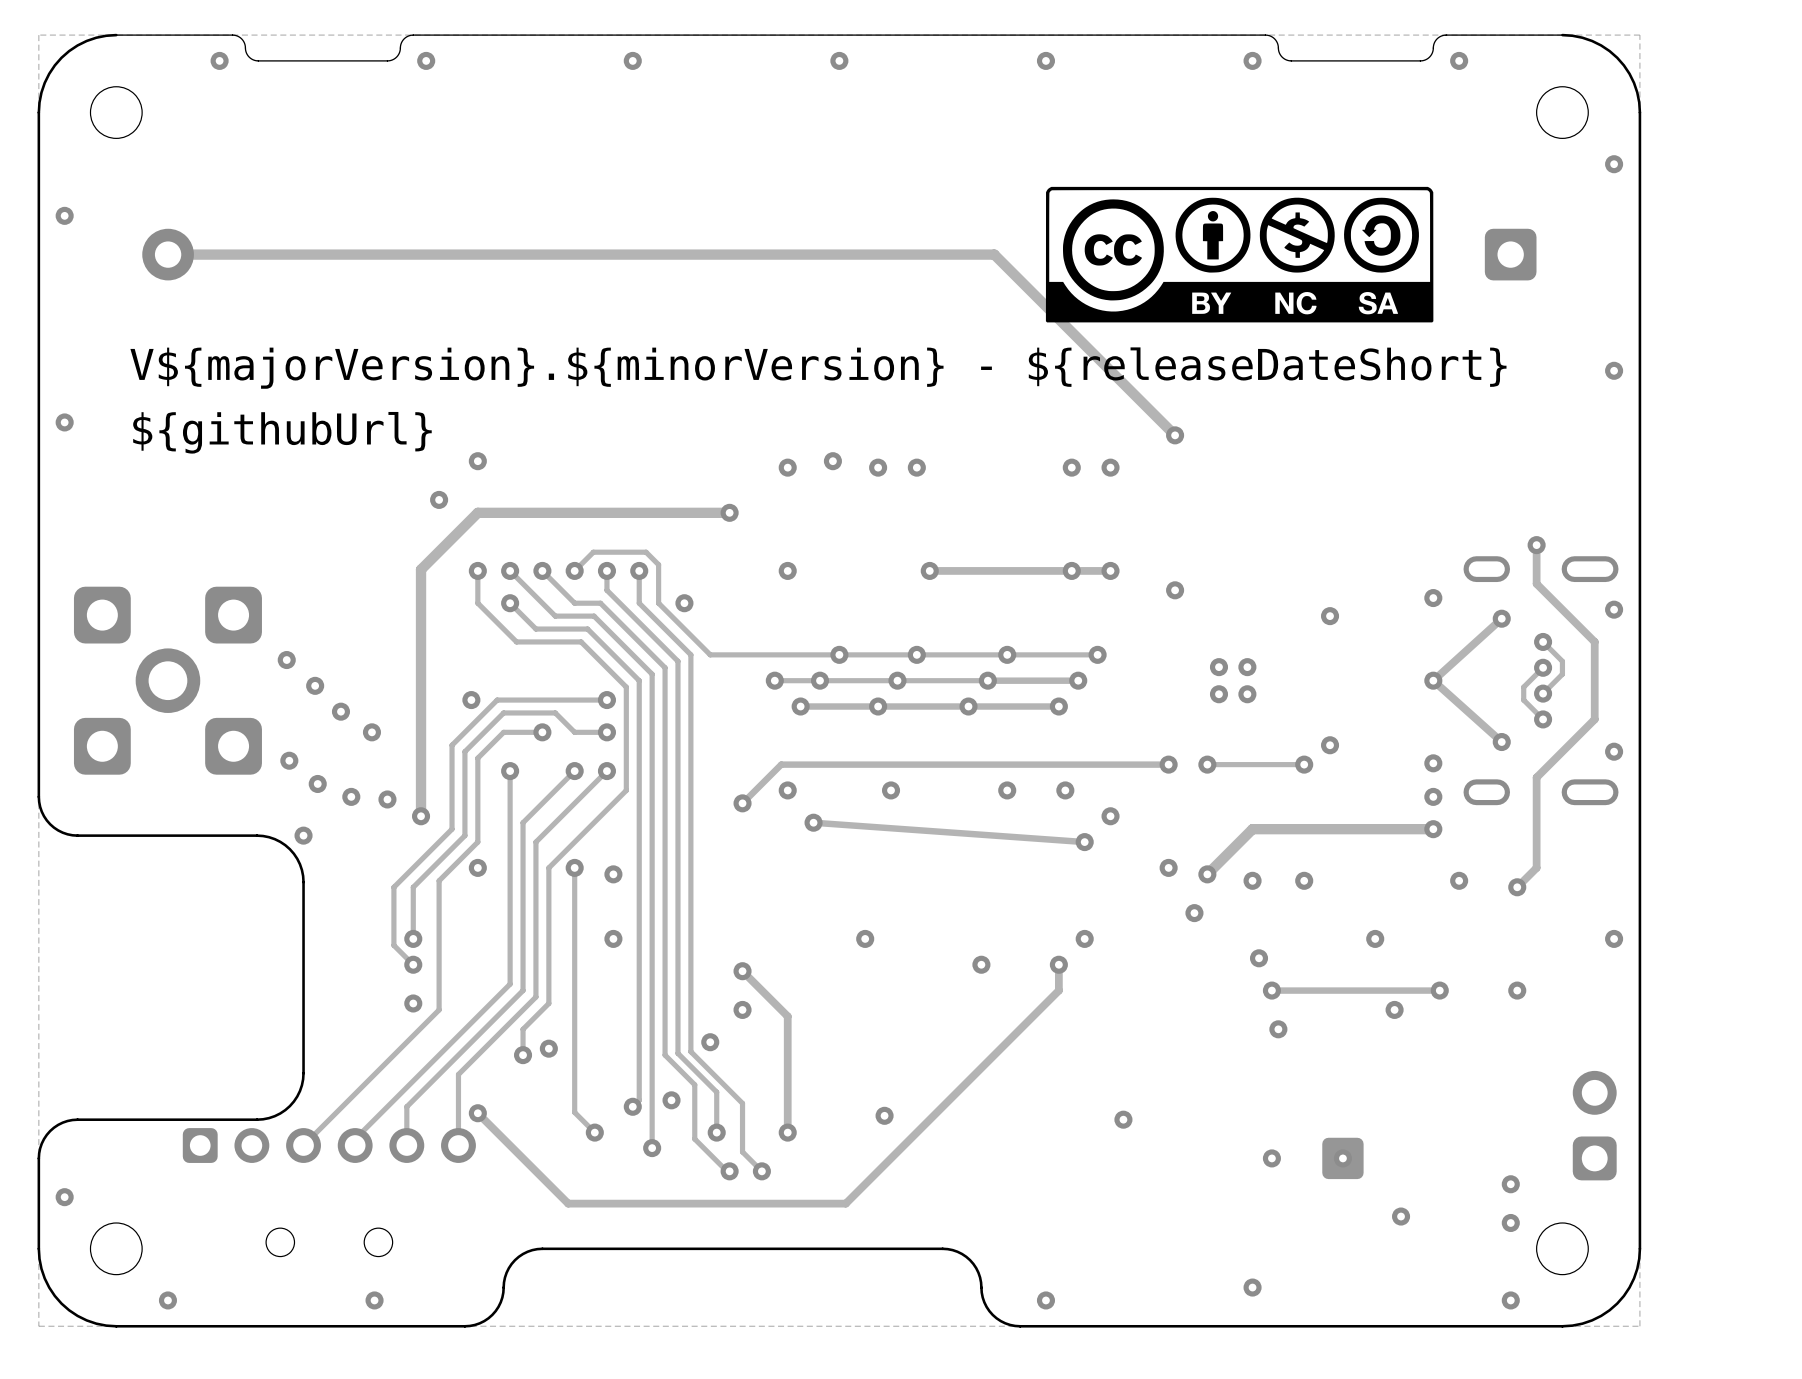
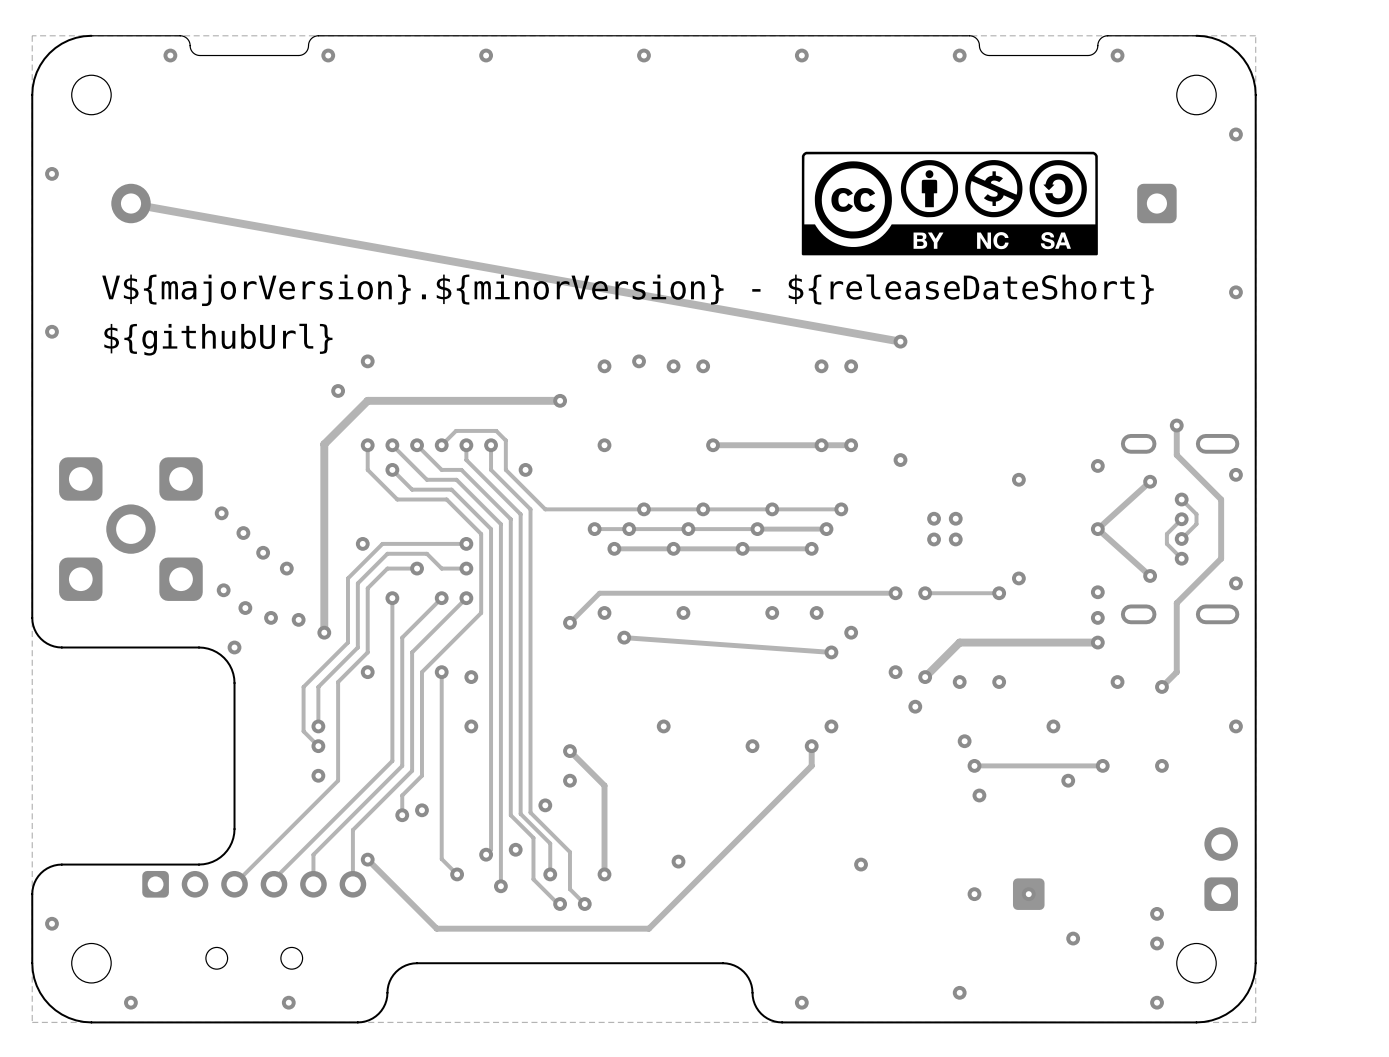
track: (168, 254) (994, 254) (1175, 435) -> (131, 203) (128, 203) (900, 341)

